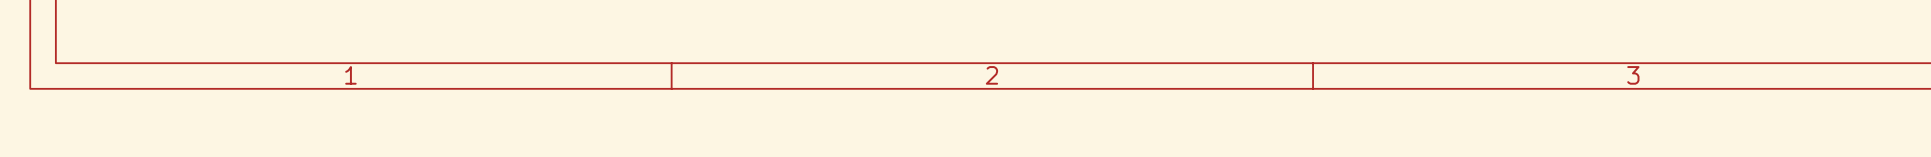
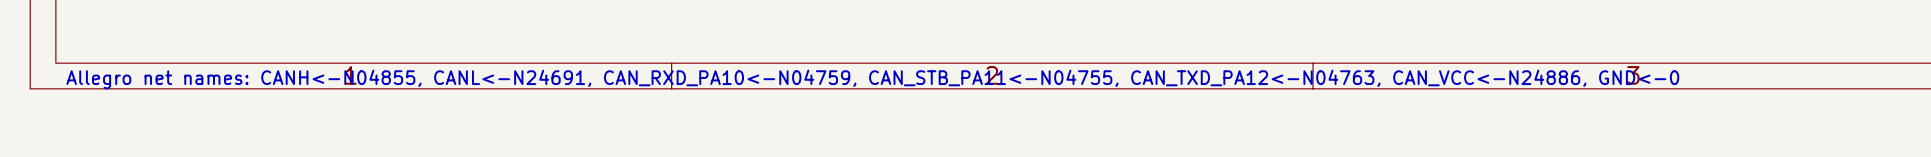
text: none -> Allegro net names: CANH<-N04855, CANL<-N24691, CAN_RXD_PA10<-N04759, CAN_STB_PA11<-N04755, CAN_TXD_PA12<-N04763, CAN_VCC<-N24886, GND<-0 (872, 79)

